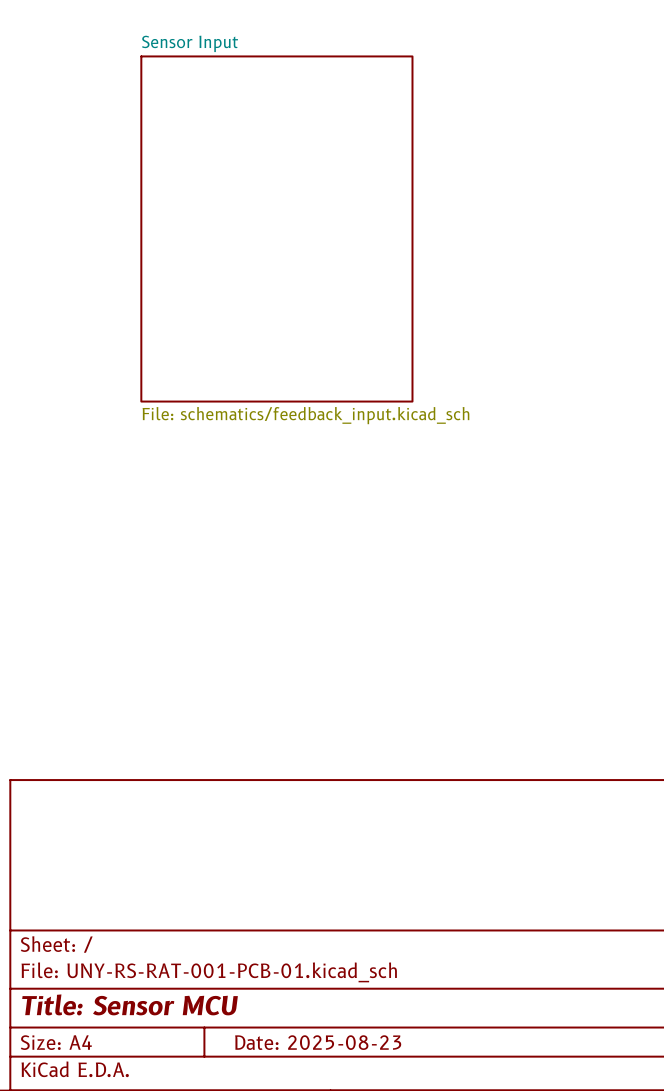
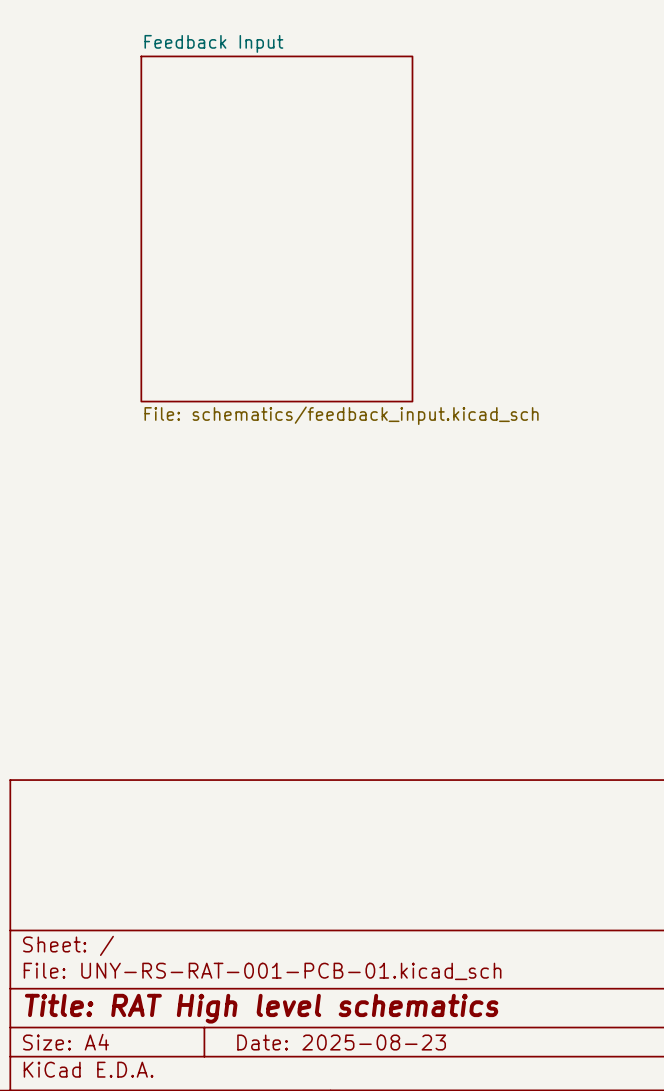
sheet Sensor Input name: Sensor Input (190, 43) -> Feedback Input (213, 43)
title block: Title: Sensor MCU (130, 1004) -> Title: RAT High level schematics (261, 1008)

